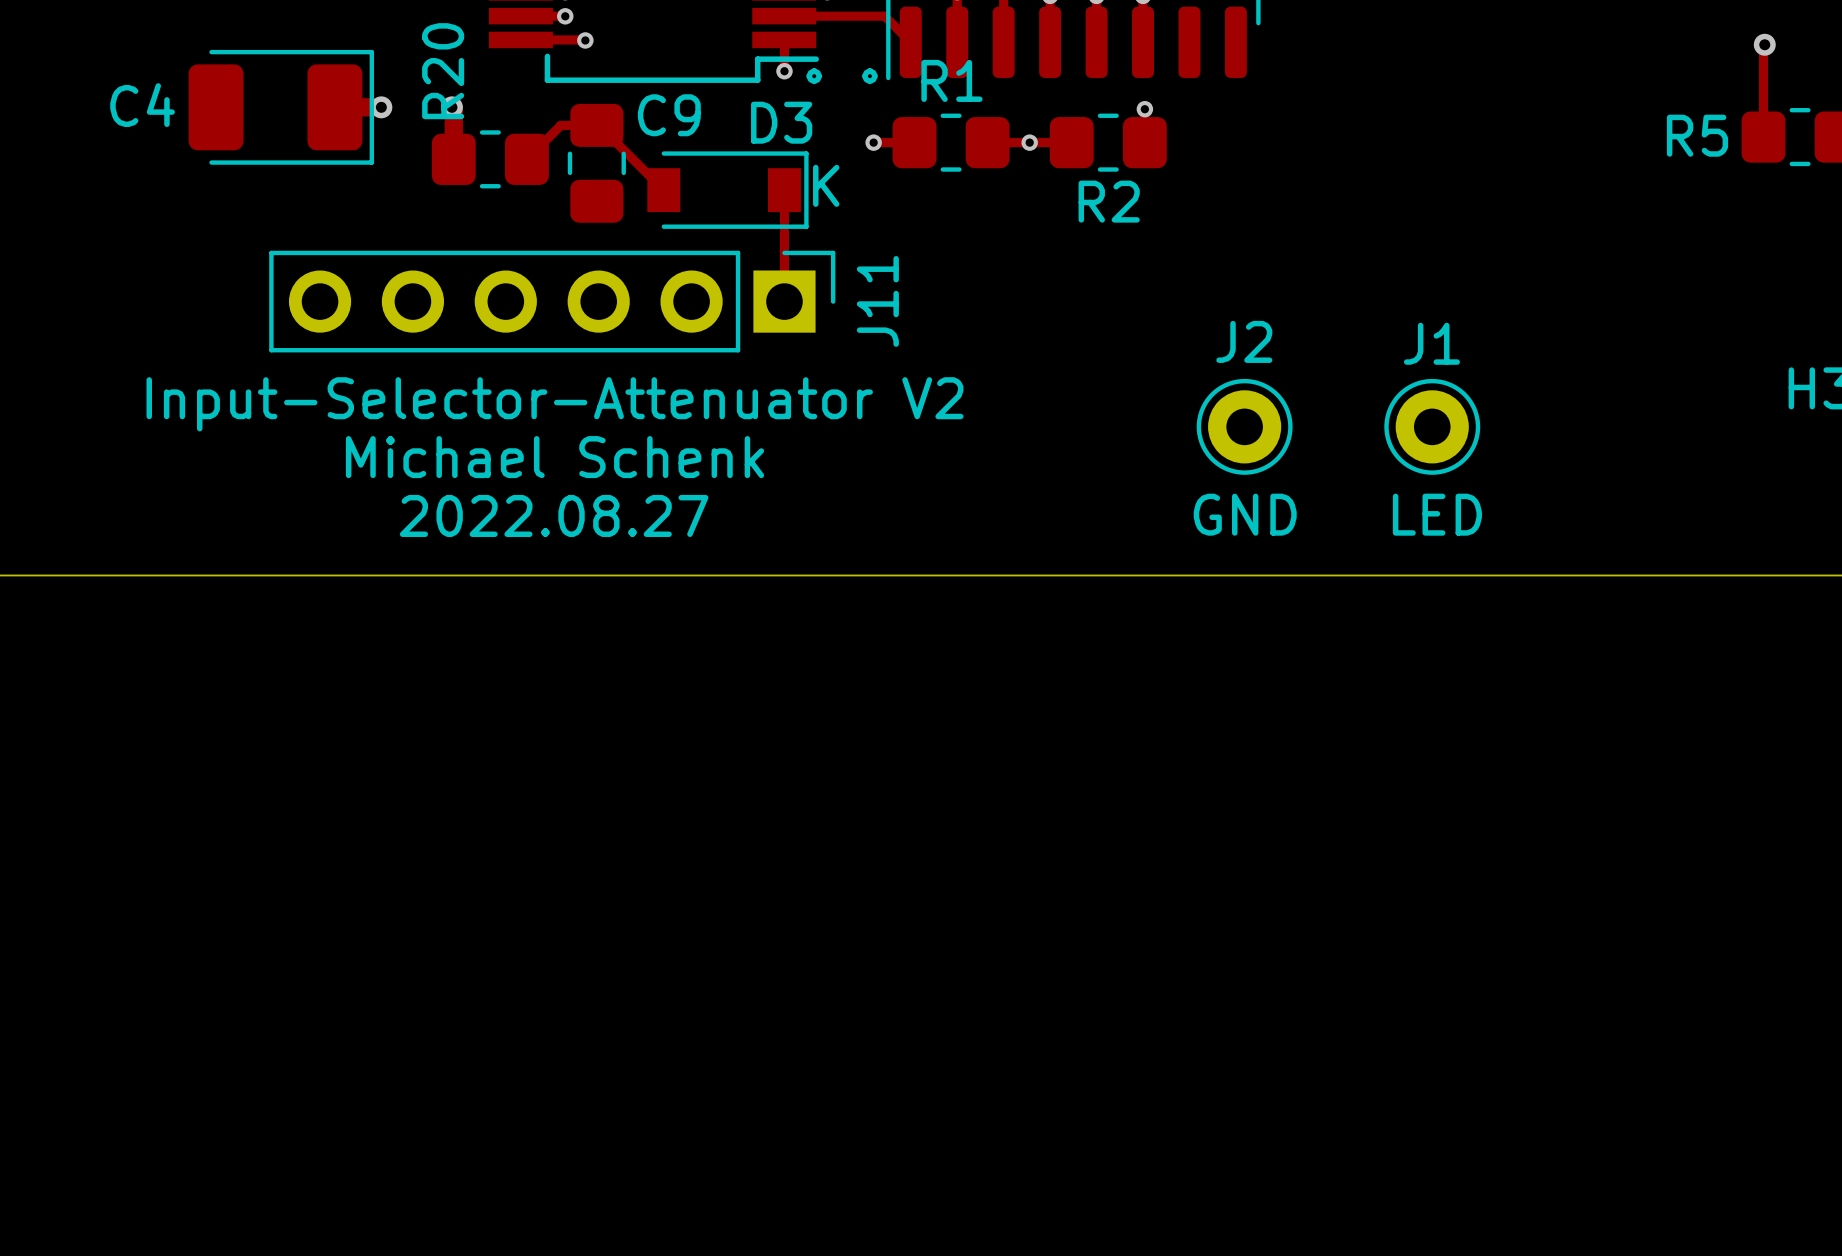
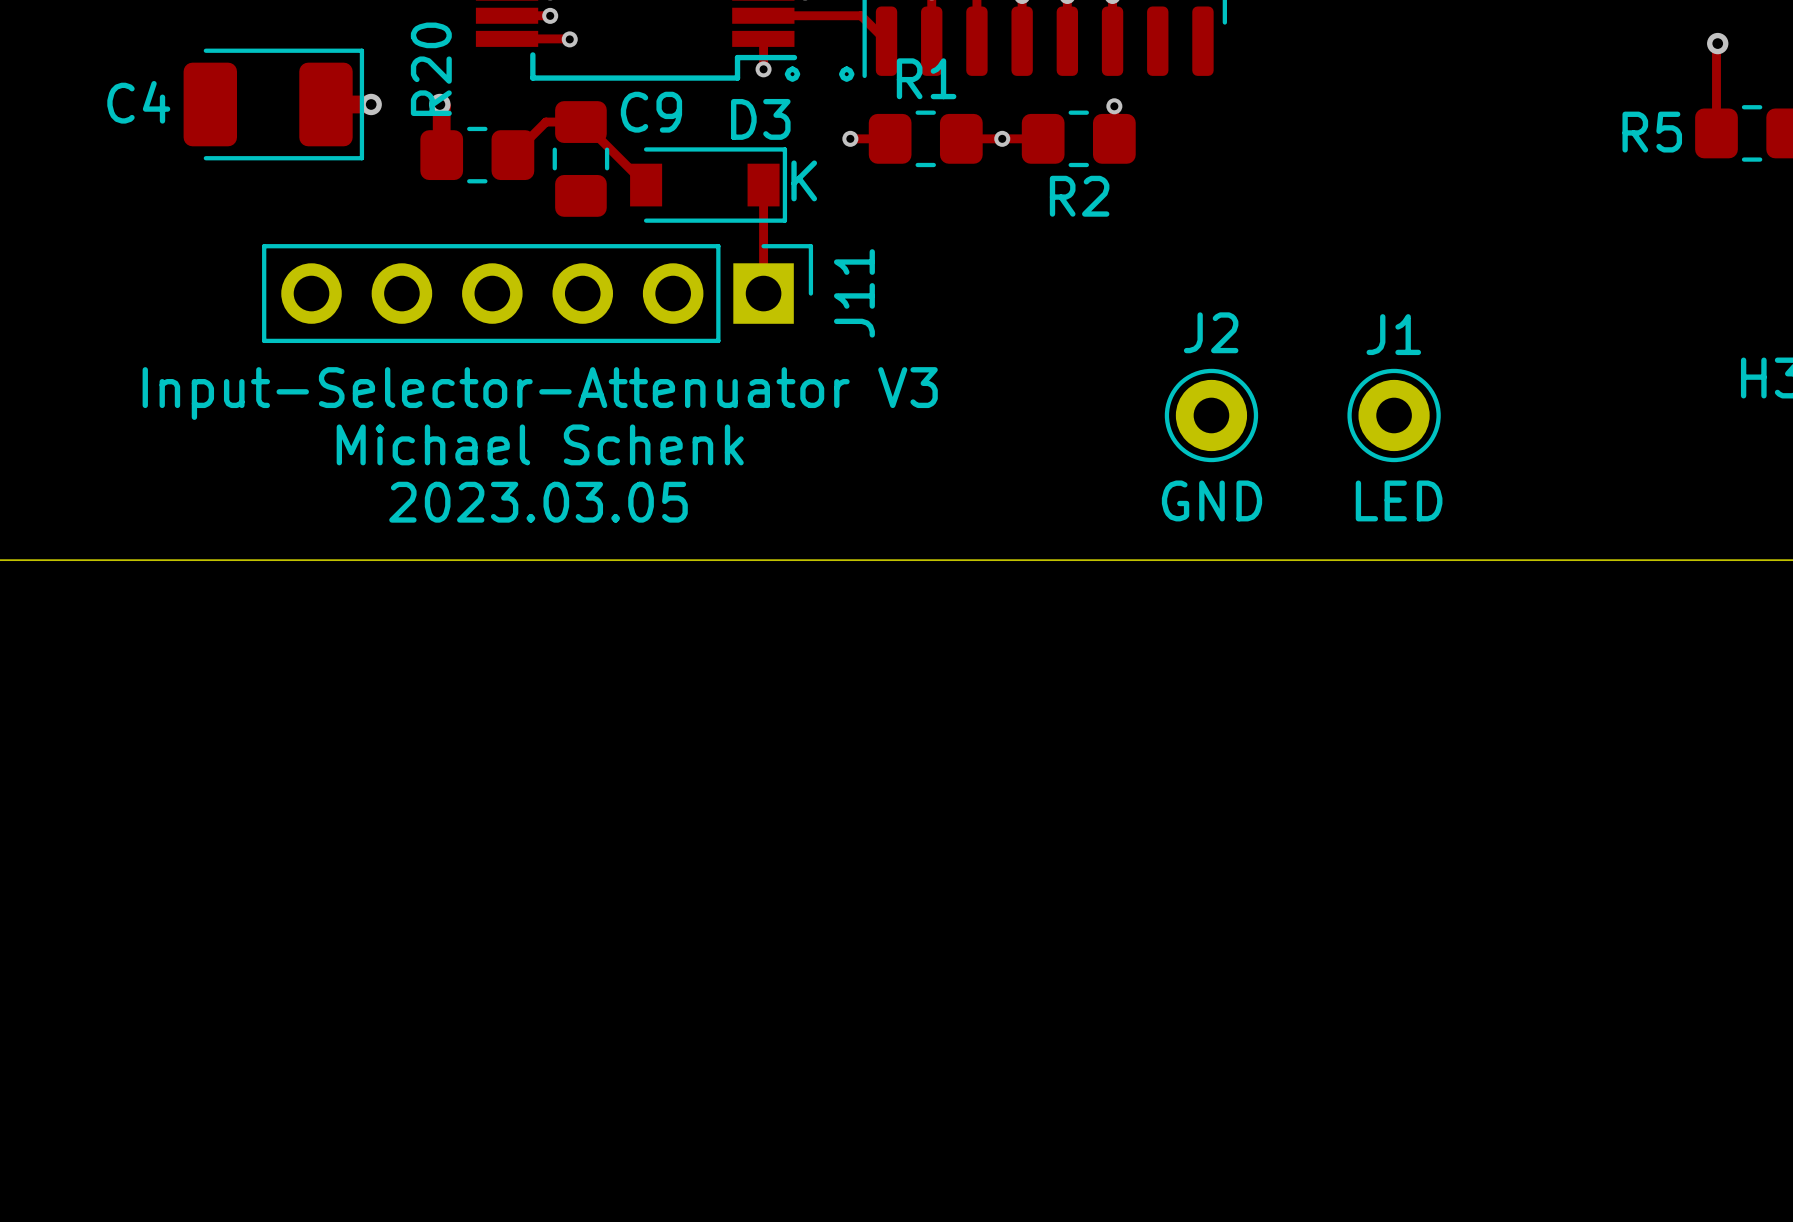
text: Input-Selector-Attenuator V2 (554, 404) -> Input-Selector-Attenuator V3 (540, 393)
text: 2022.08.27 (554, 515) -> 2023.03.05 (538, 502)

